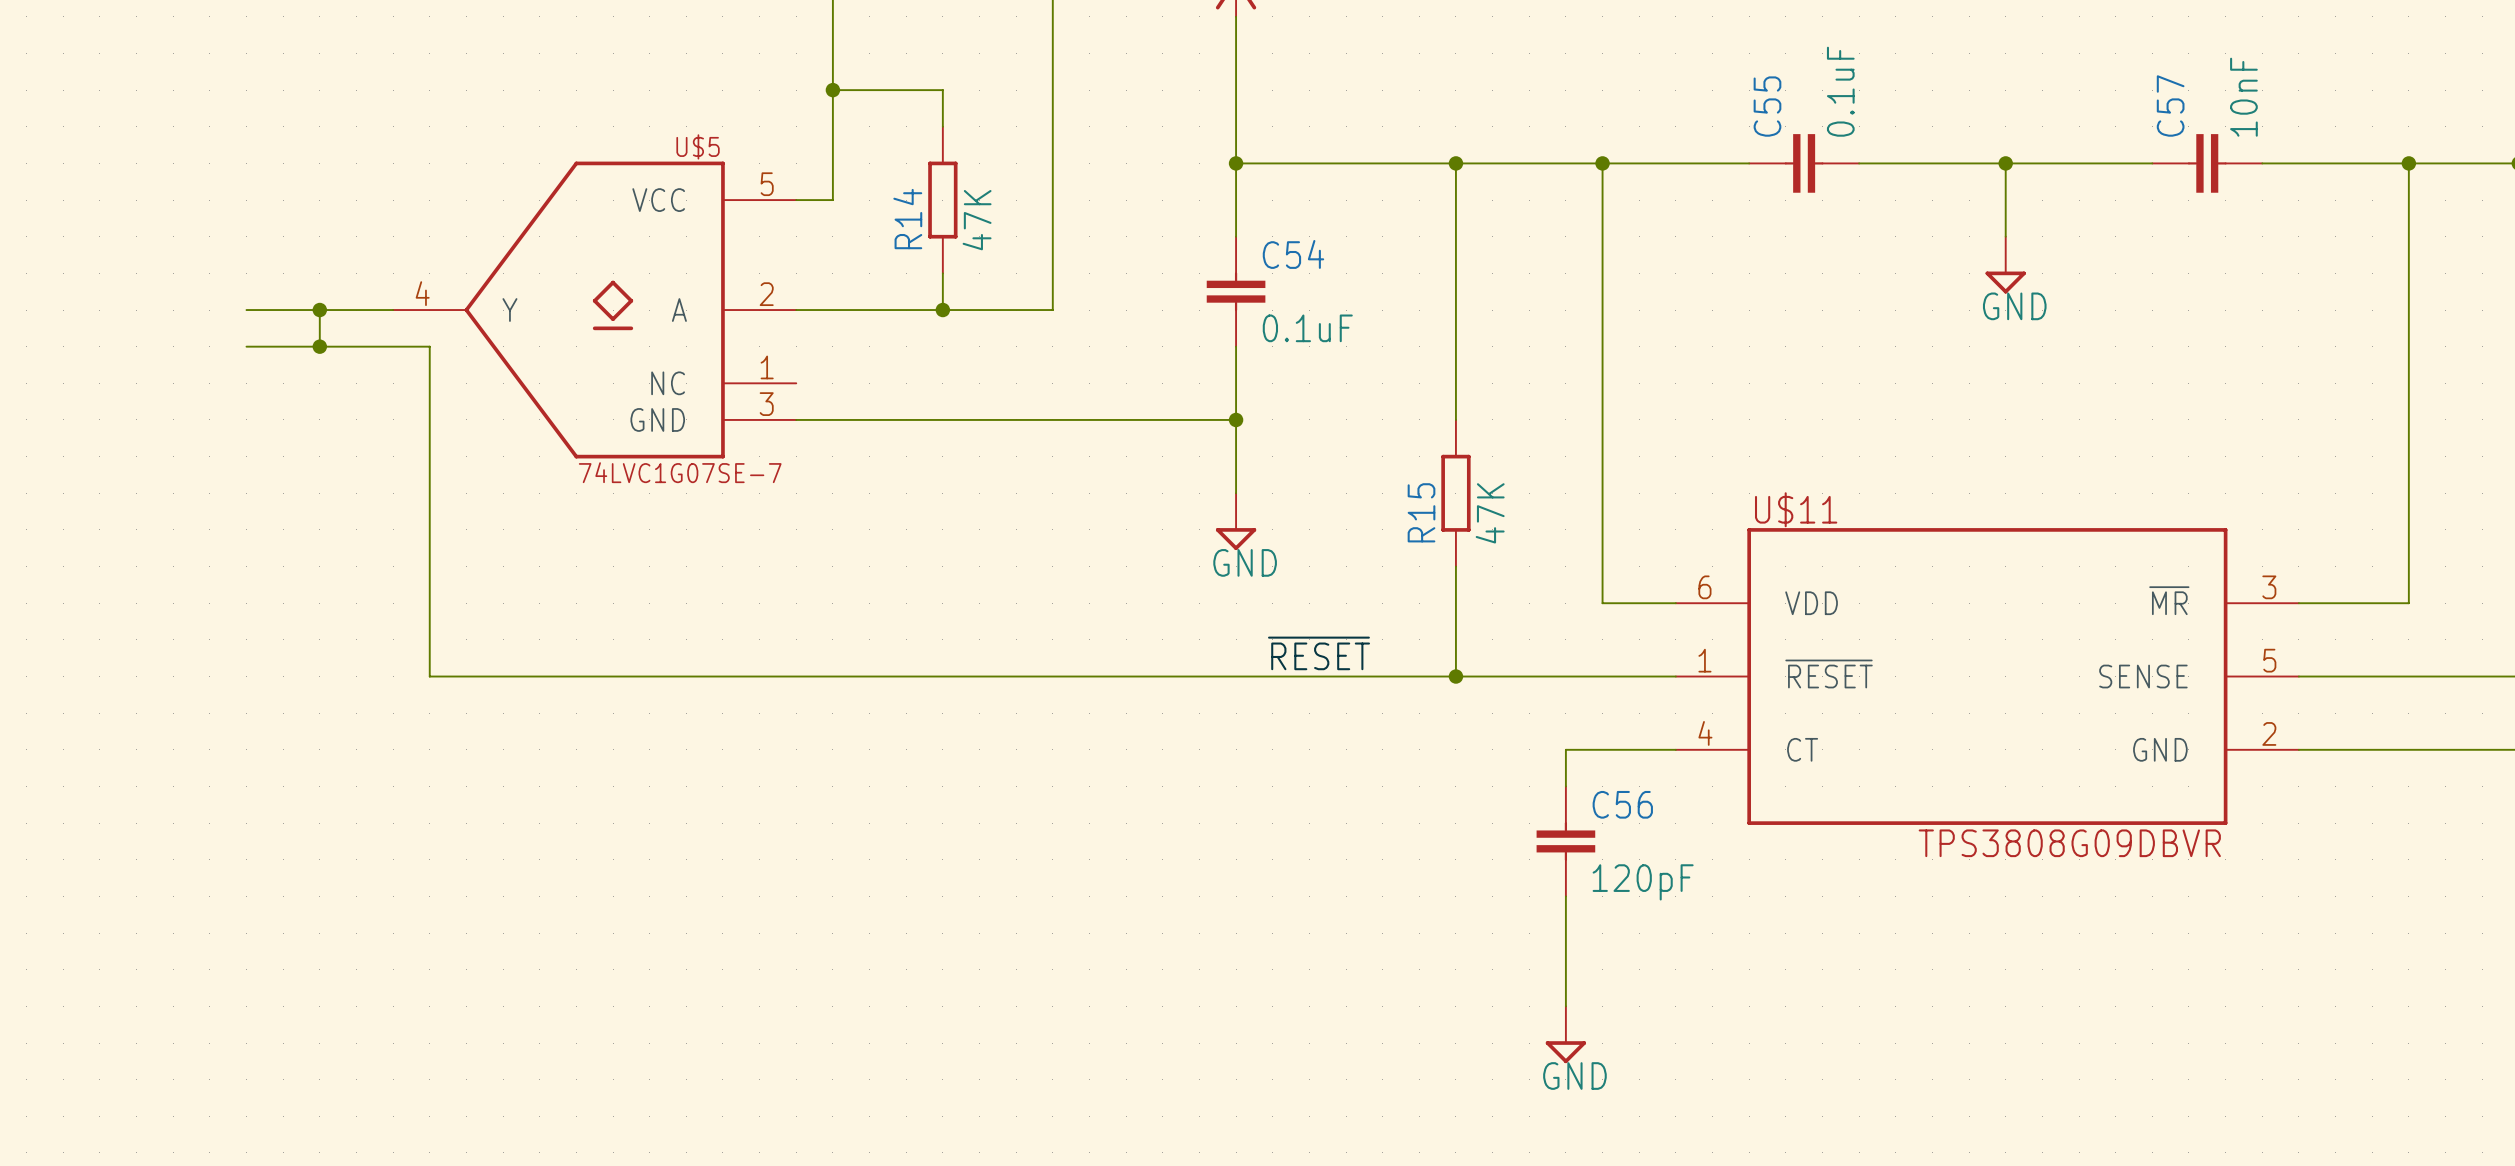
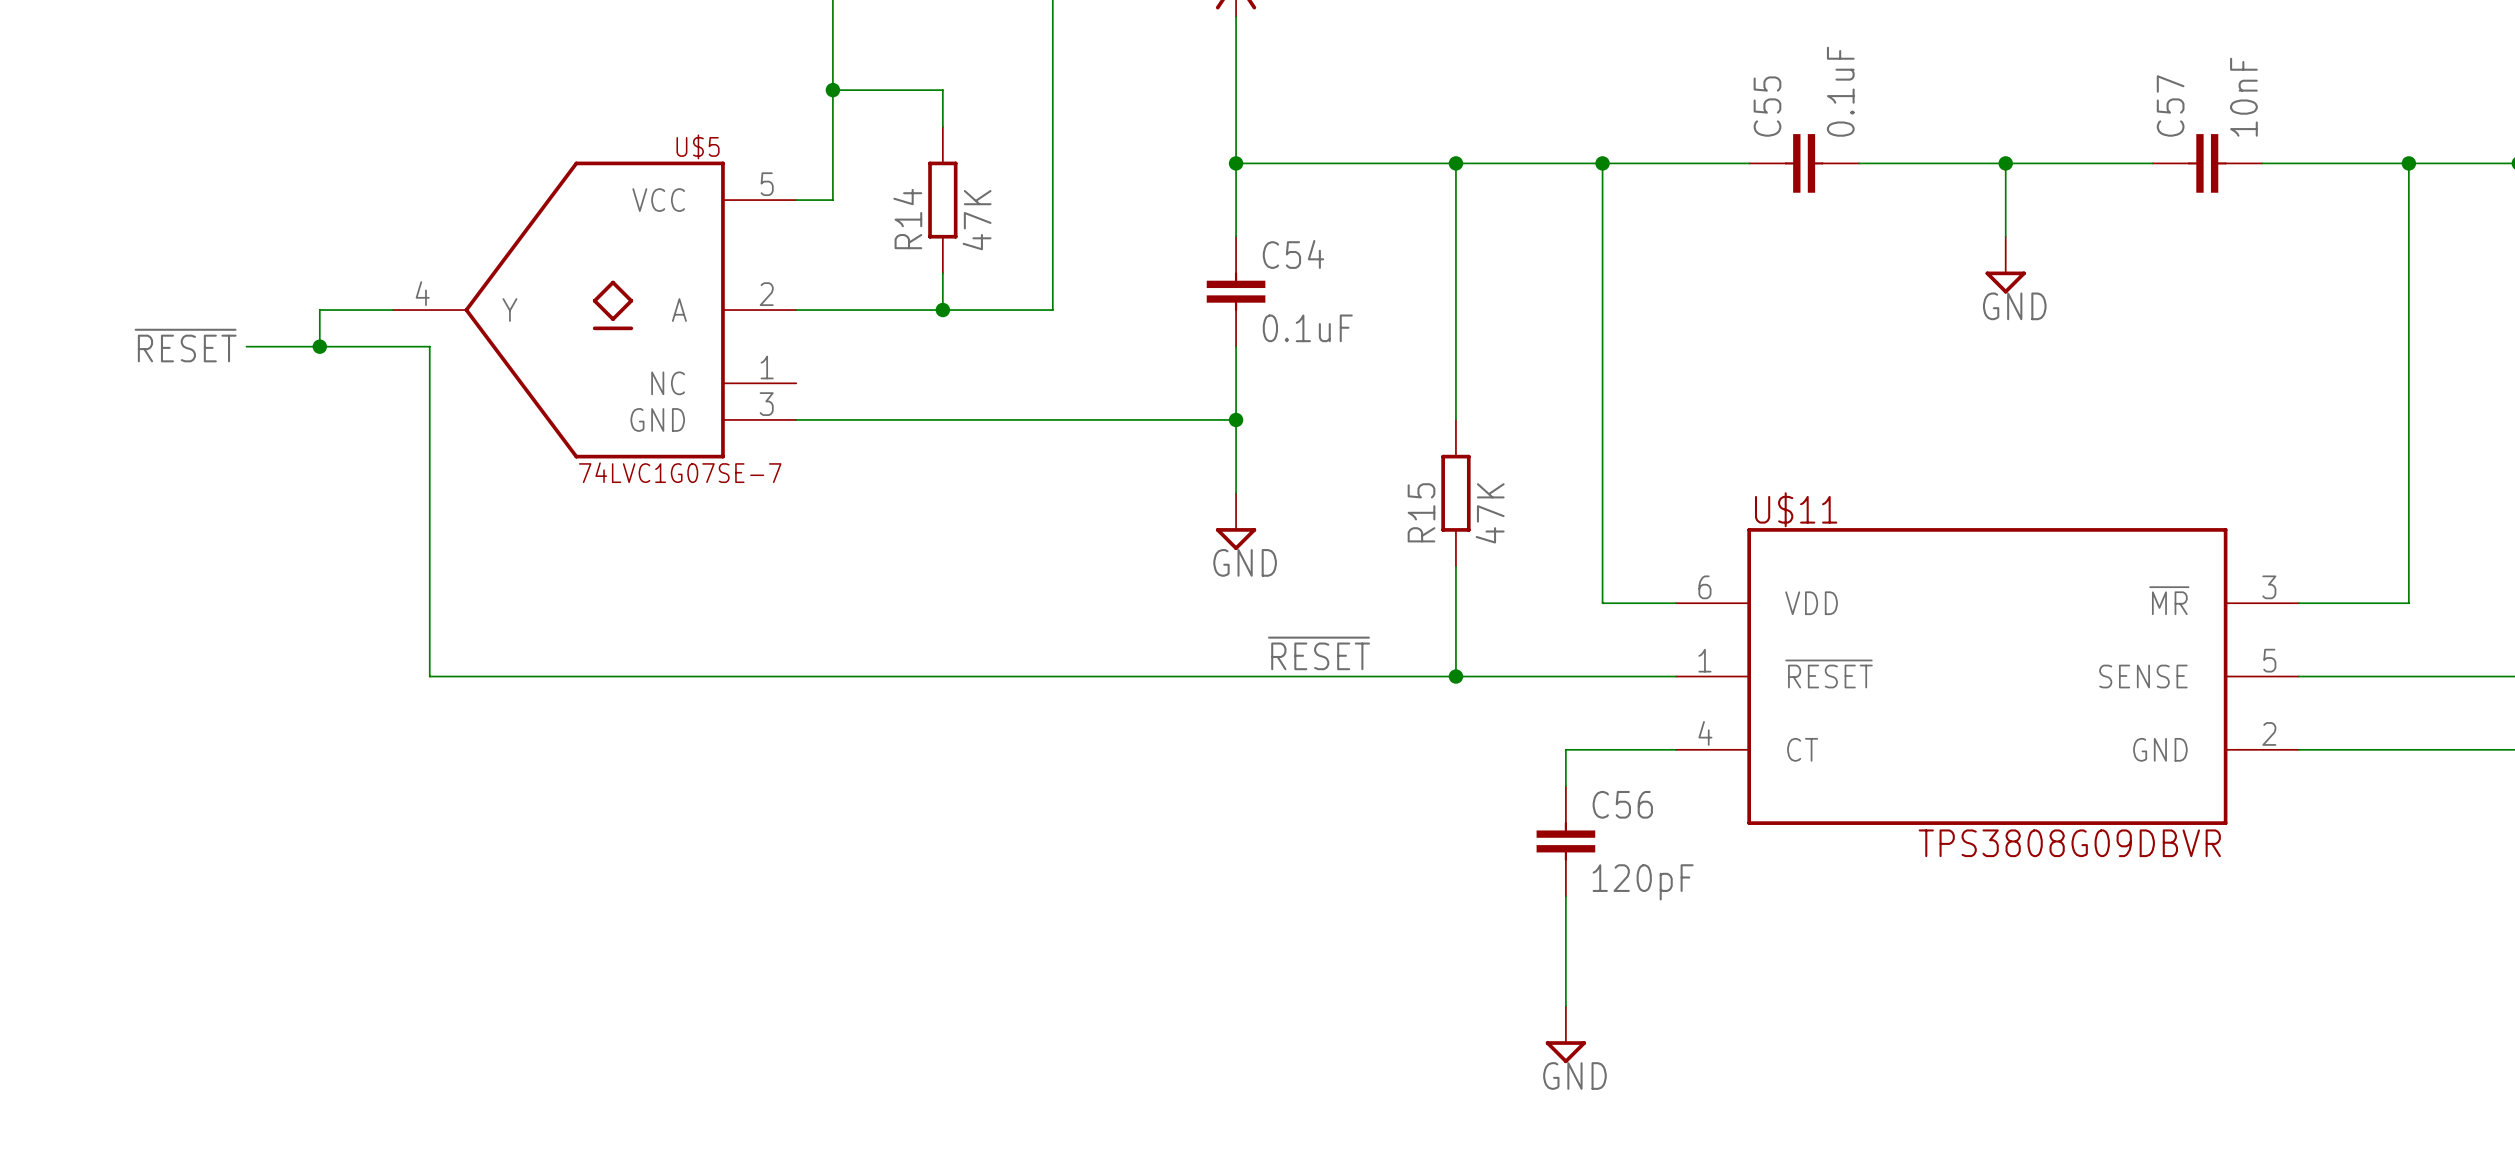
wire: (246, 310) (319, 310) -> none
junction: (319, 310) -> none
label: none -> ~{RESET} (185, 345)

